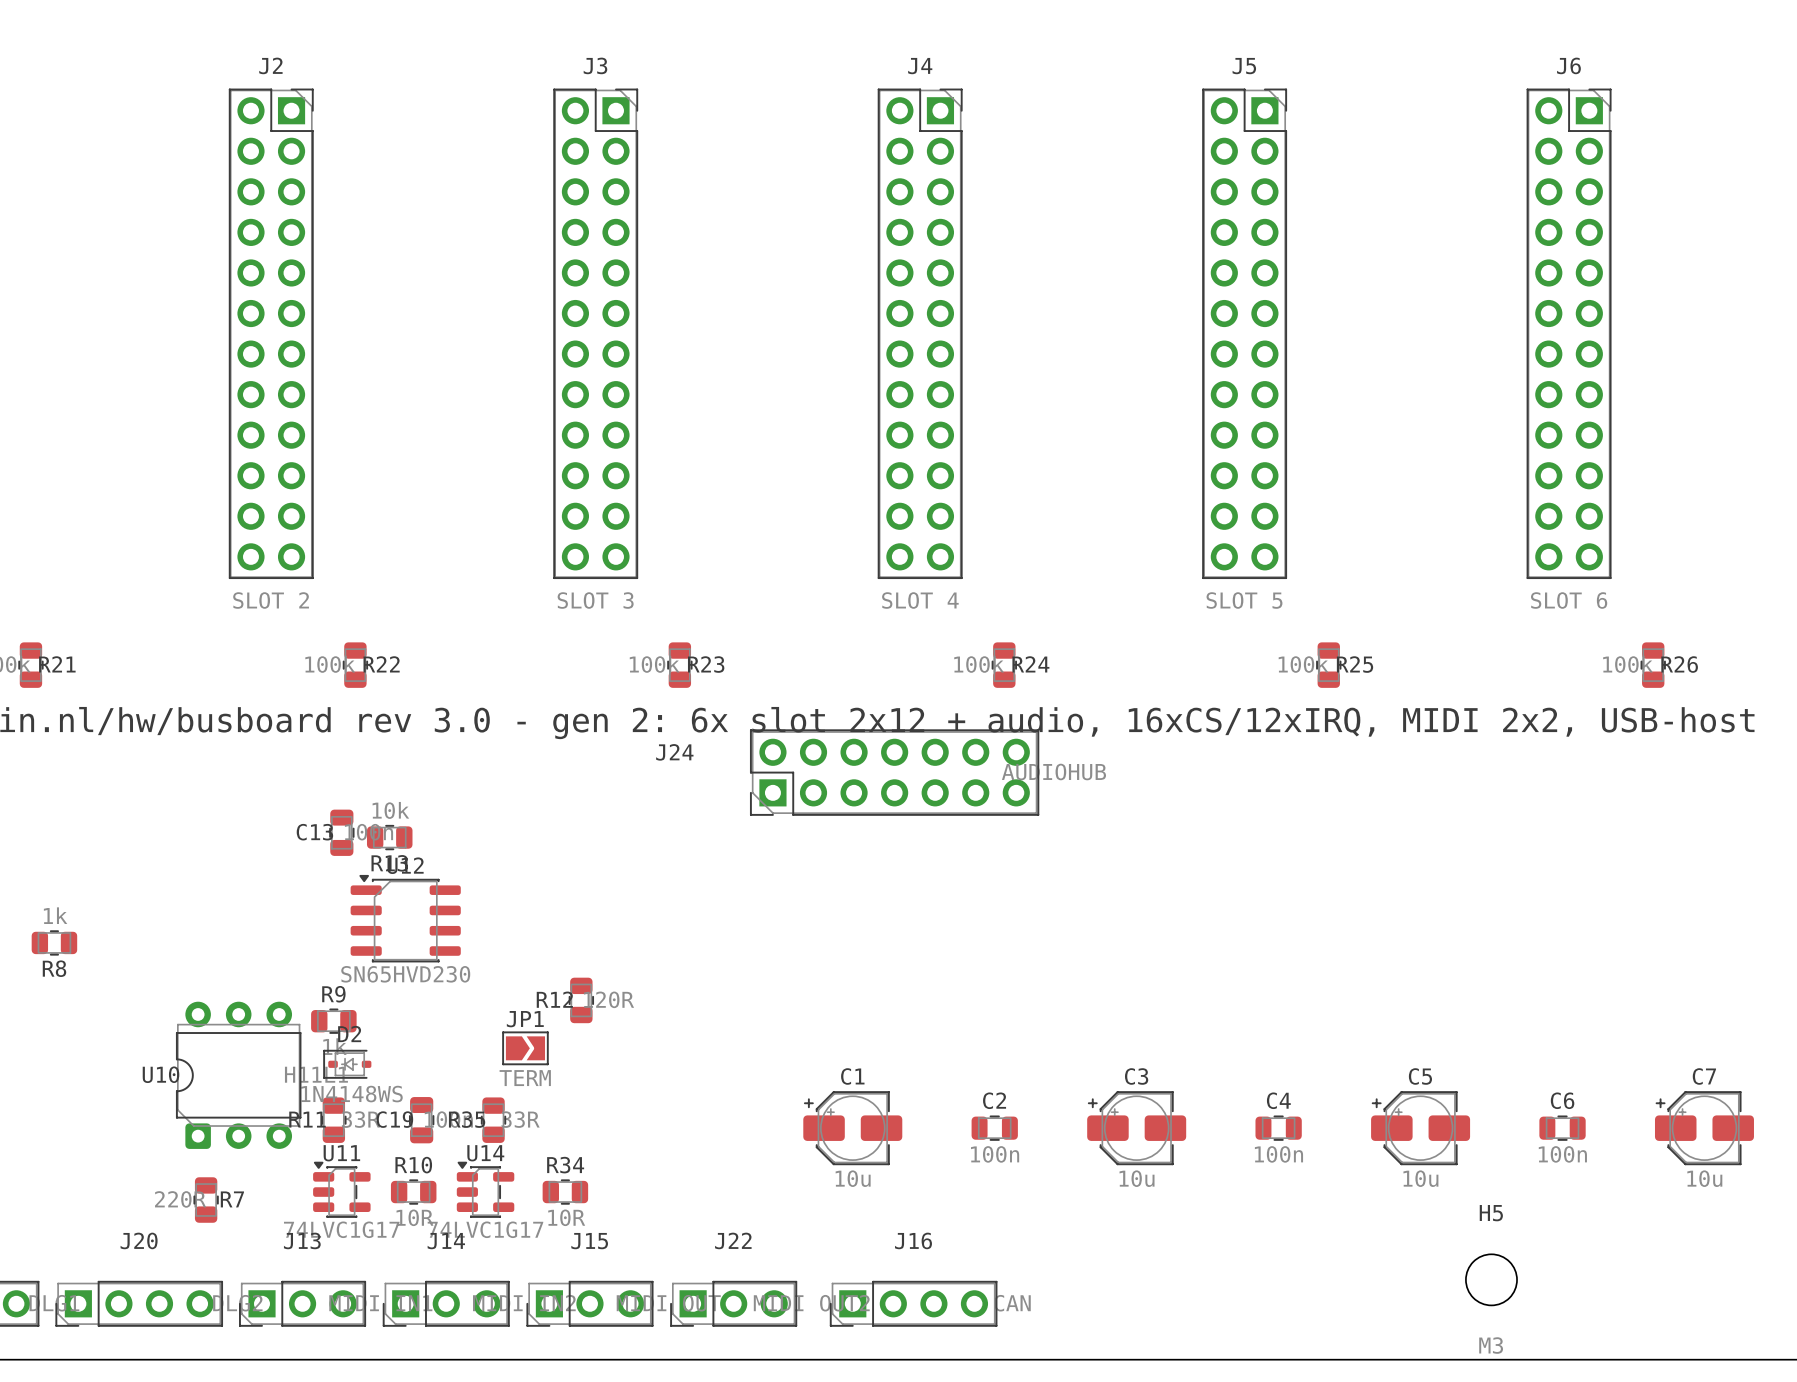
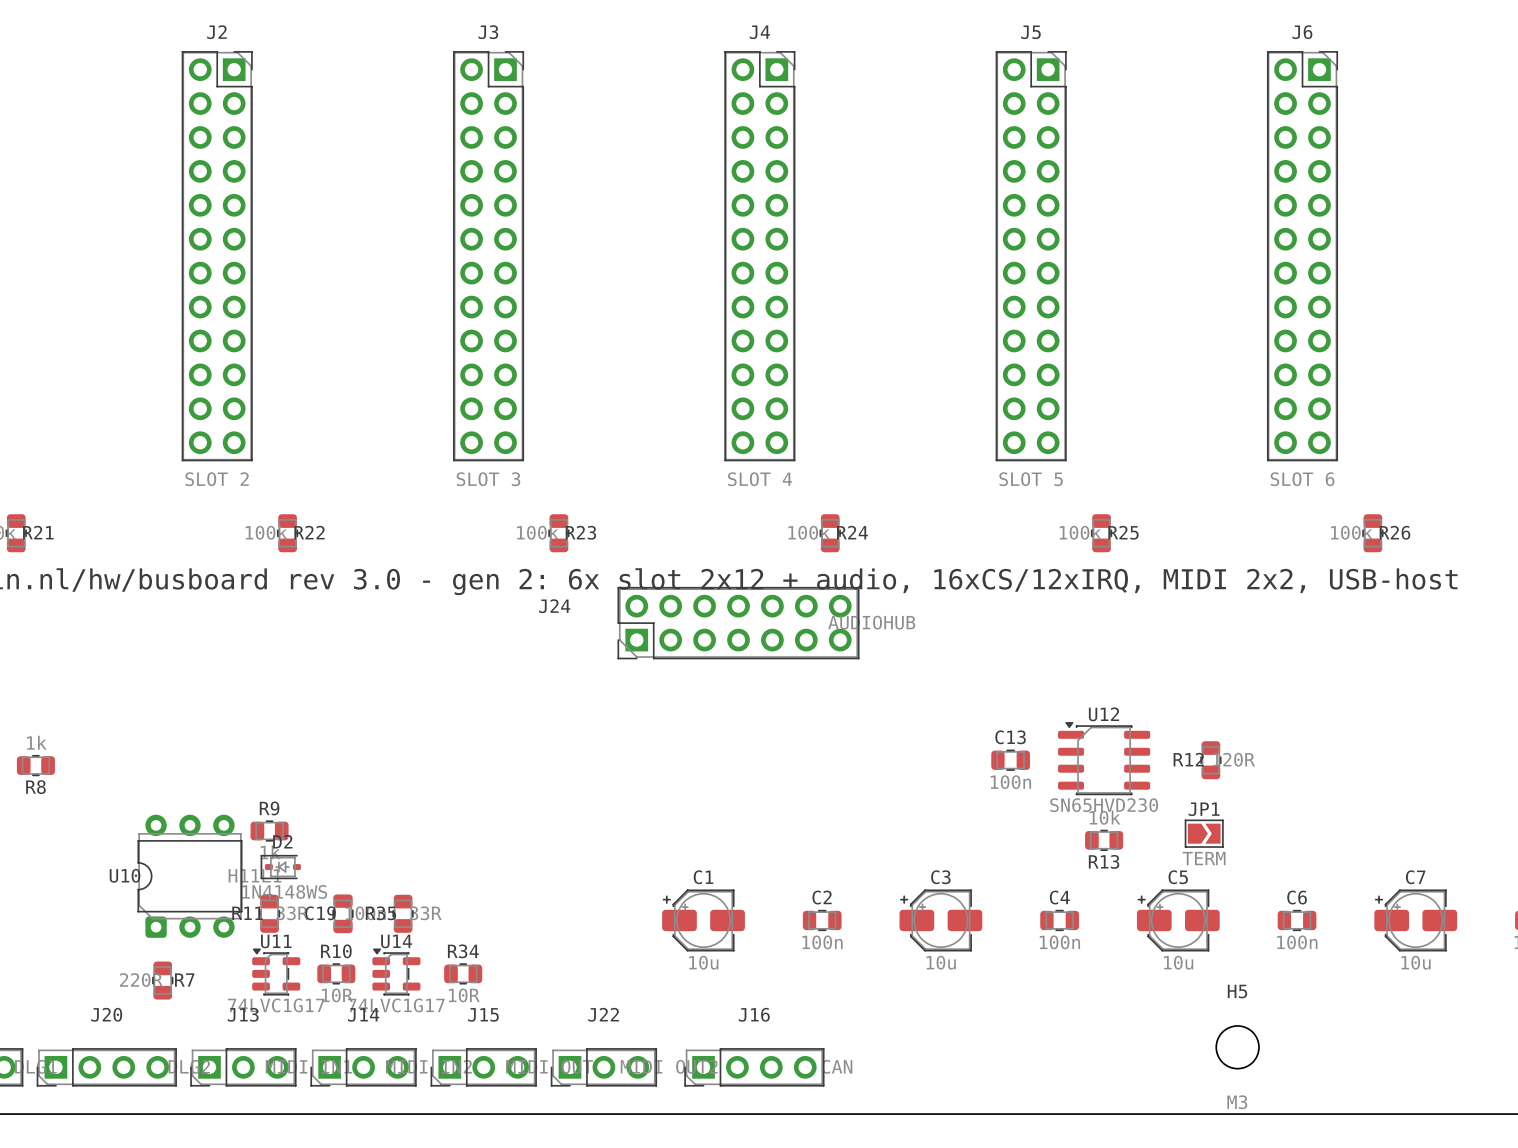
C13 rotation: 0° (341, 832) -> 90° clockwise (1010, 760)
C13 position: (341, 832) -> (1010, 760)
R13 position: (389, 837) -> (1104, 840)
U12 position: (405, 918) -> (1104, 758)
R12 position: (581, 1000) -> (1210, 760)
JP1 position: (525, 1048) -> (1204, 833)

